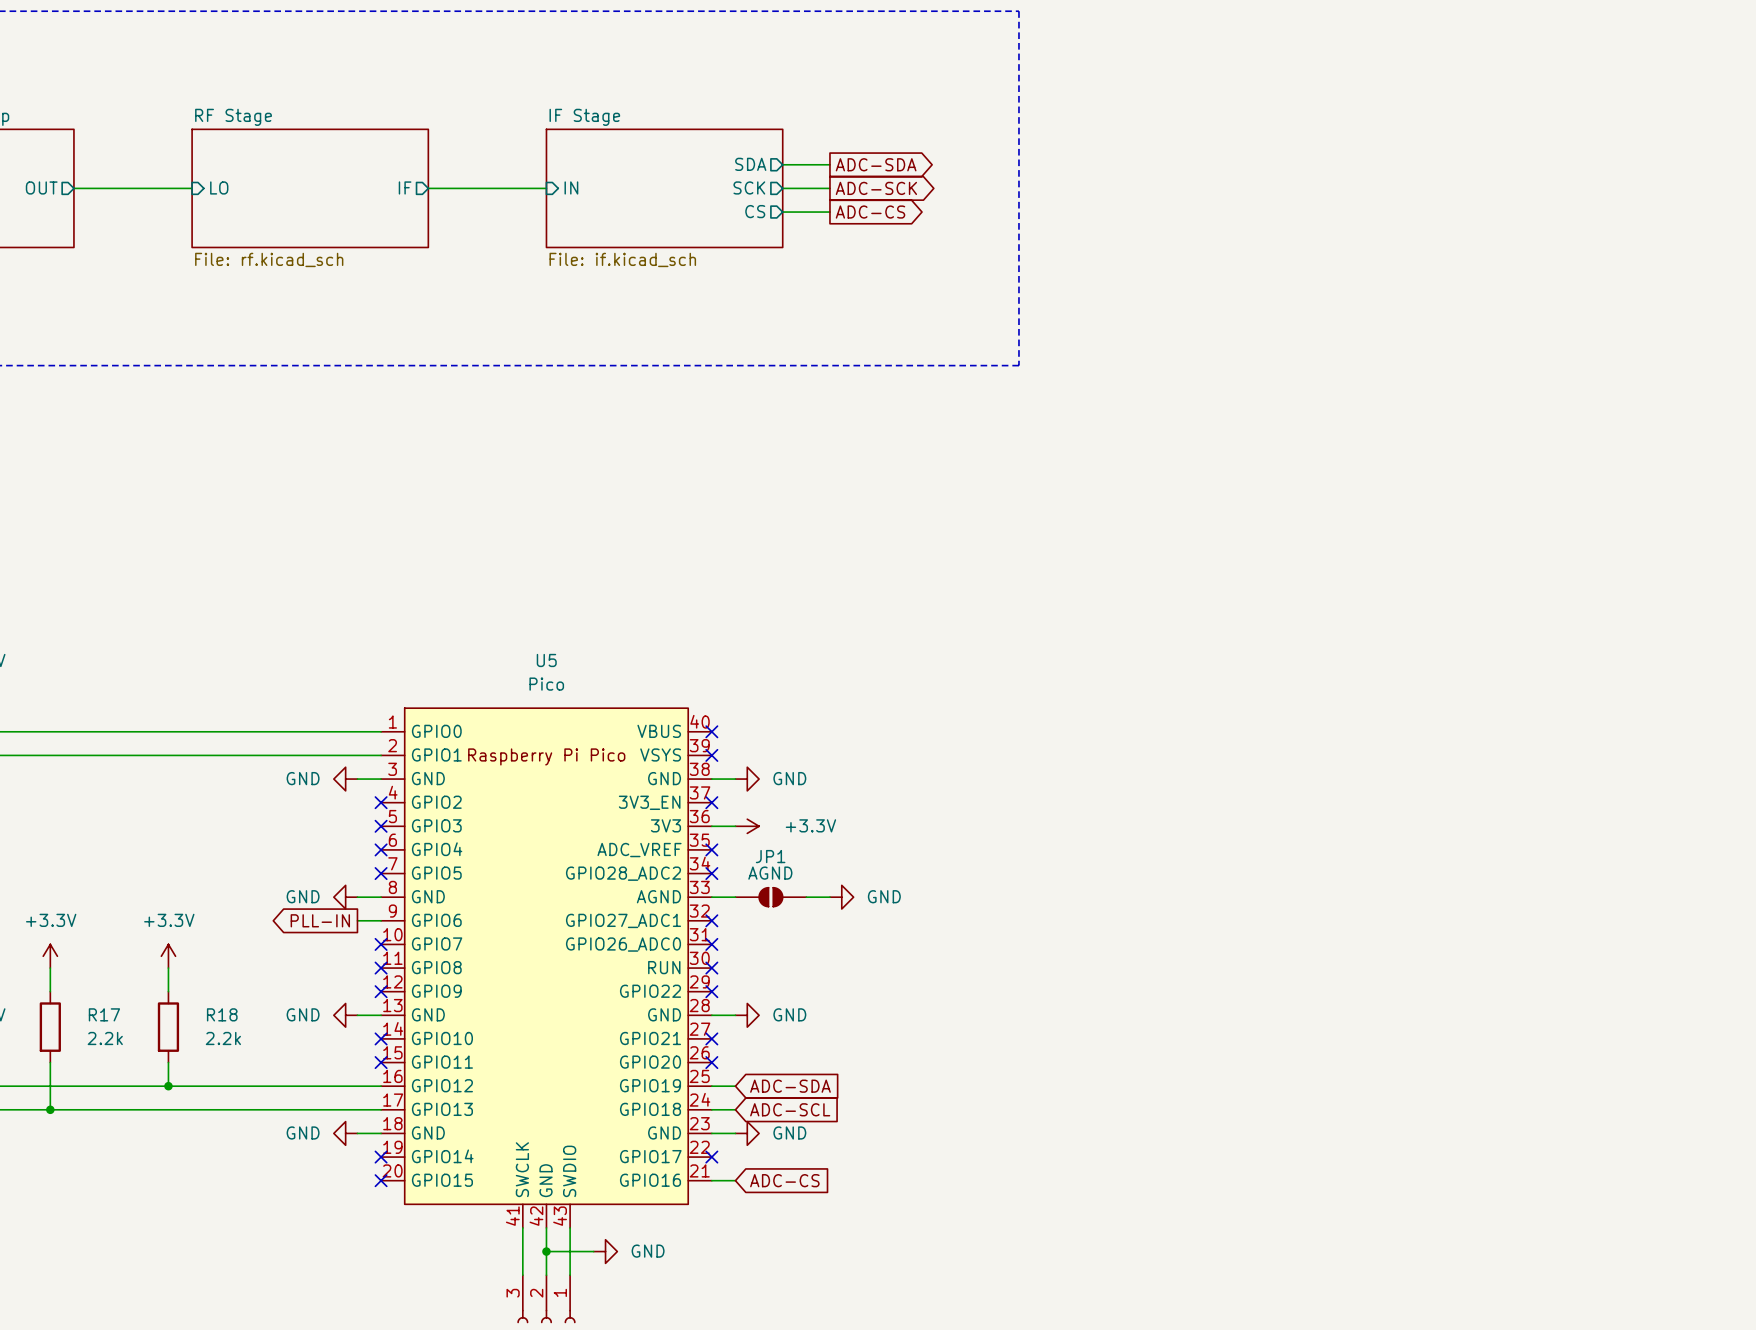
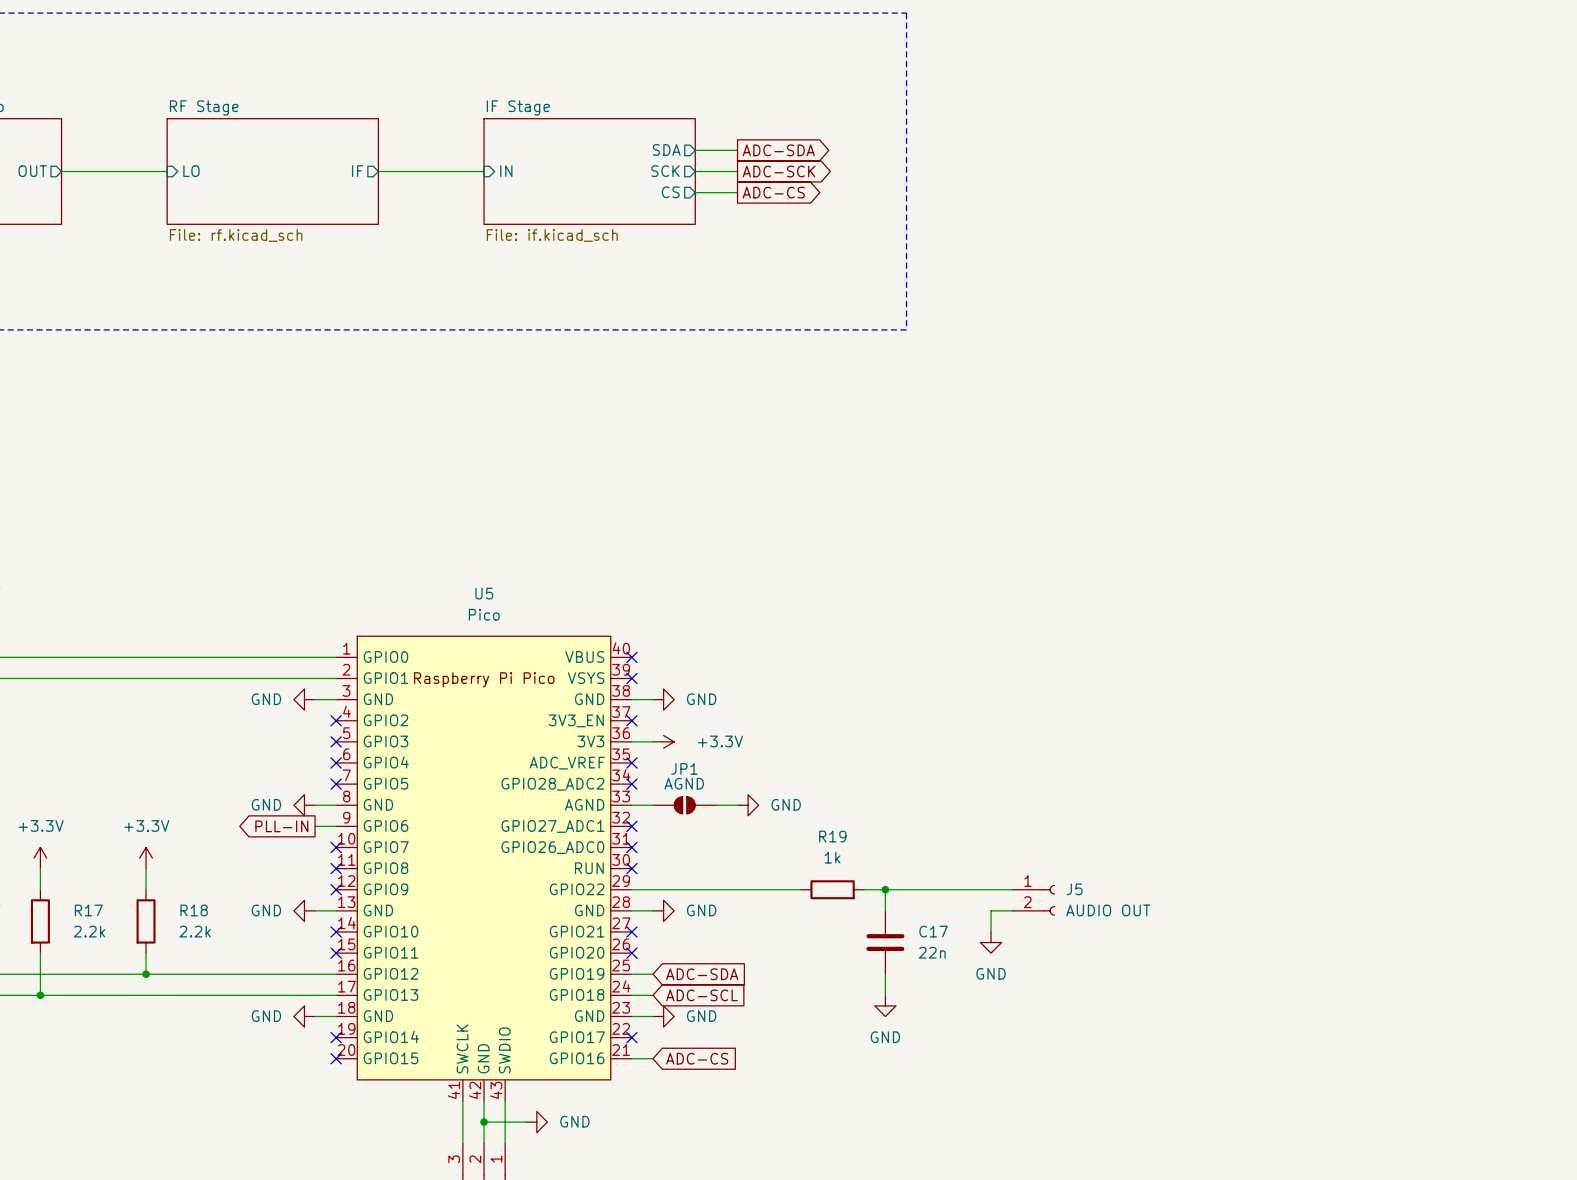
wire: none -> (631, 889) (800, 889)
no-connect mark: (711, 991) -> none
R19: none -> 1k (832, 889)
wire: none -> (864, 889) (1012, 889)
wire: none -> (885, 889) (885, 910)
junction: none -> (885, 889)
J5: none -> AUDIO OUT (1033, 900)
wire: none -> (1012, 910) (991, 910) (991, 931)
C17: none -> 22n (885, 942)
power symbol: none -> GND (991, 942)
wire: none -> (885, 974) (885, 995)
power symbol: none -> GND (885, 1005)

